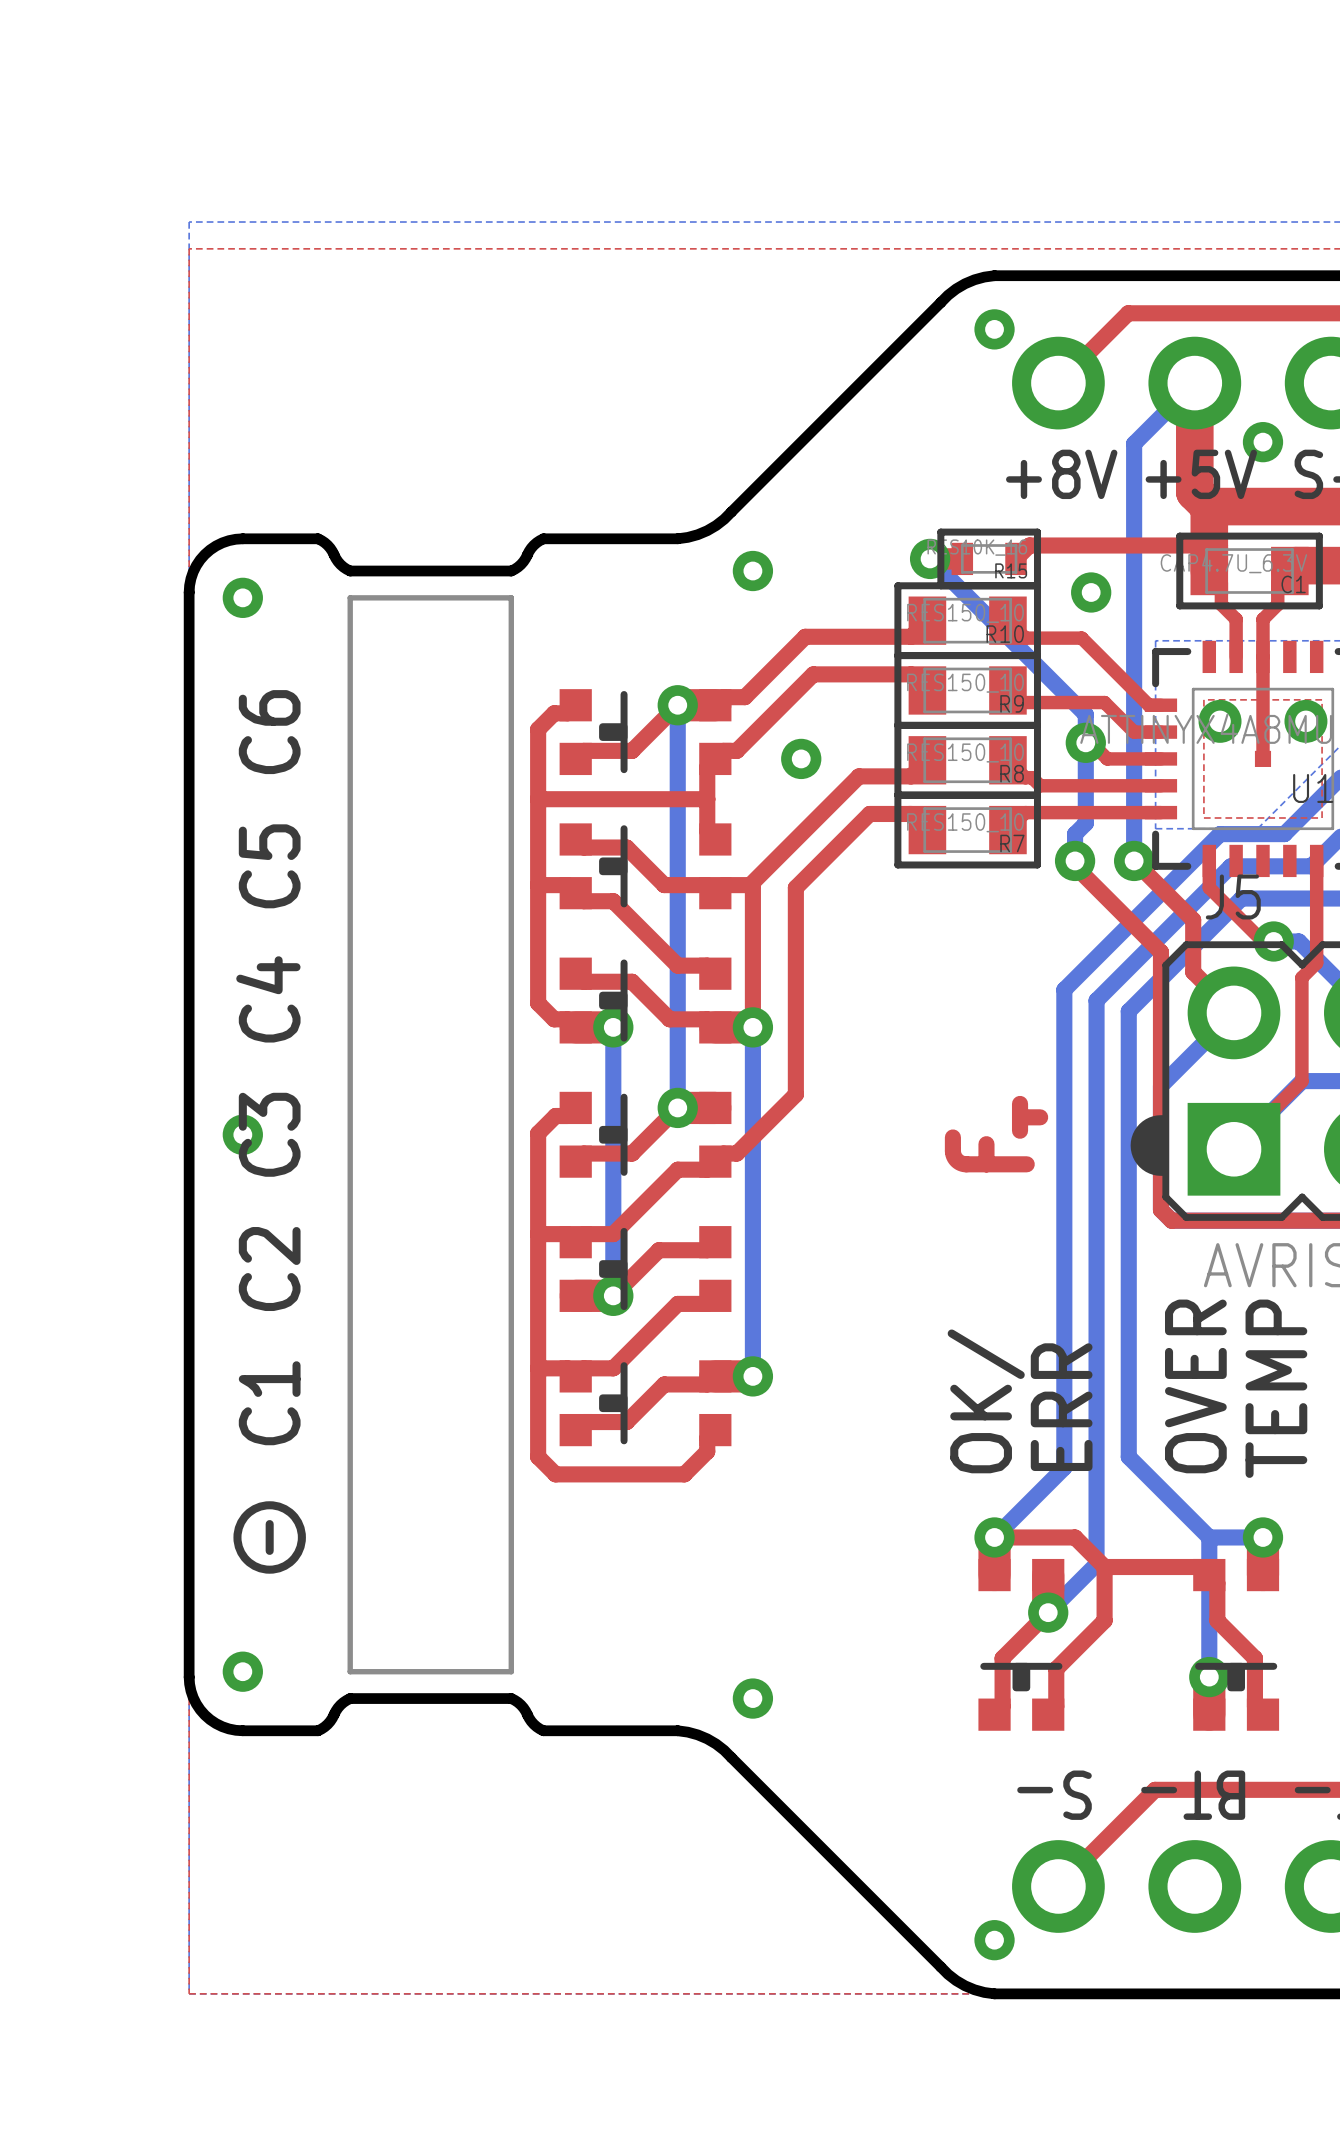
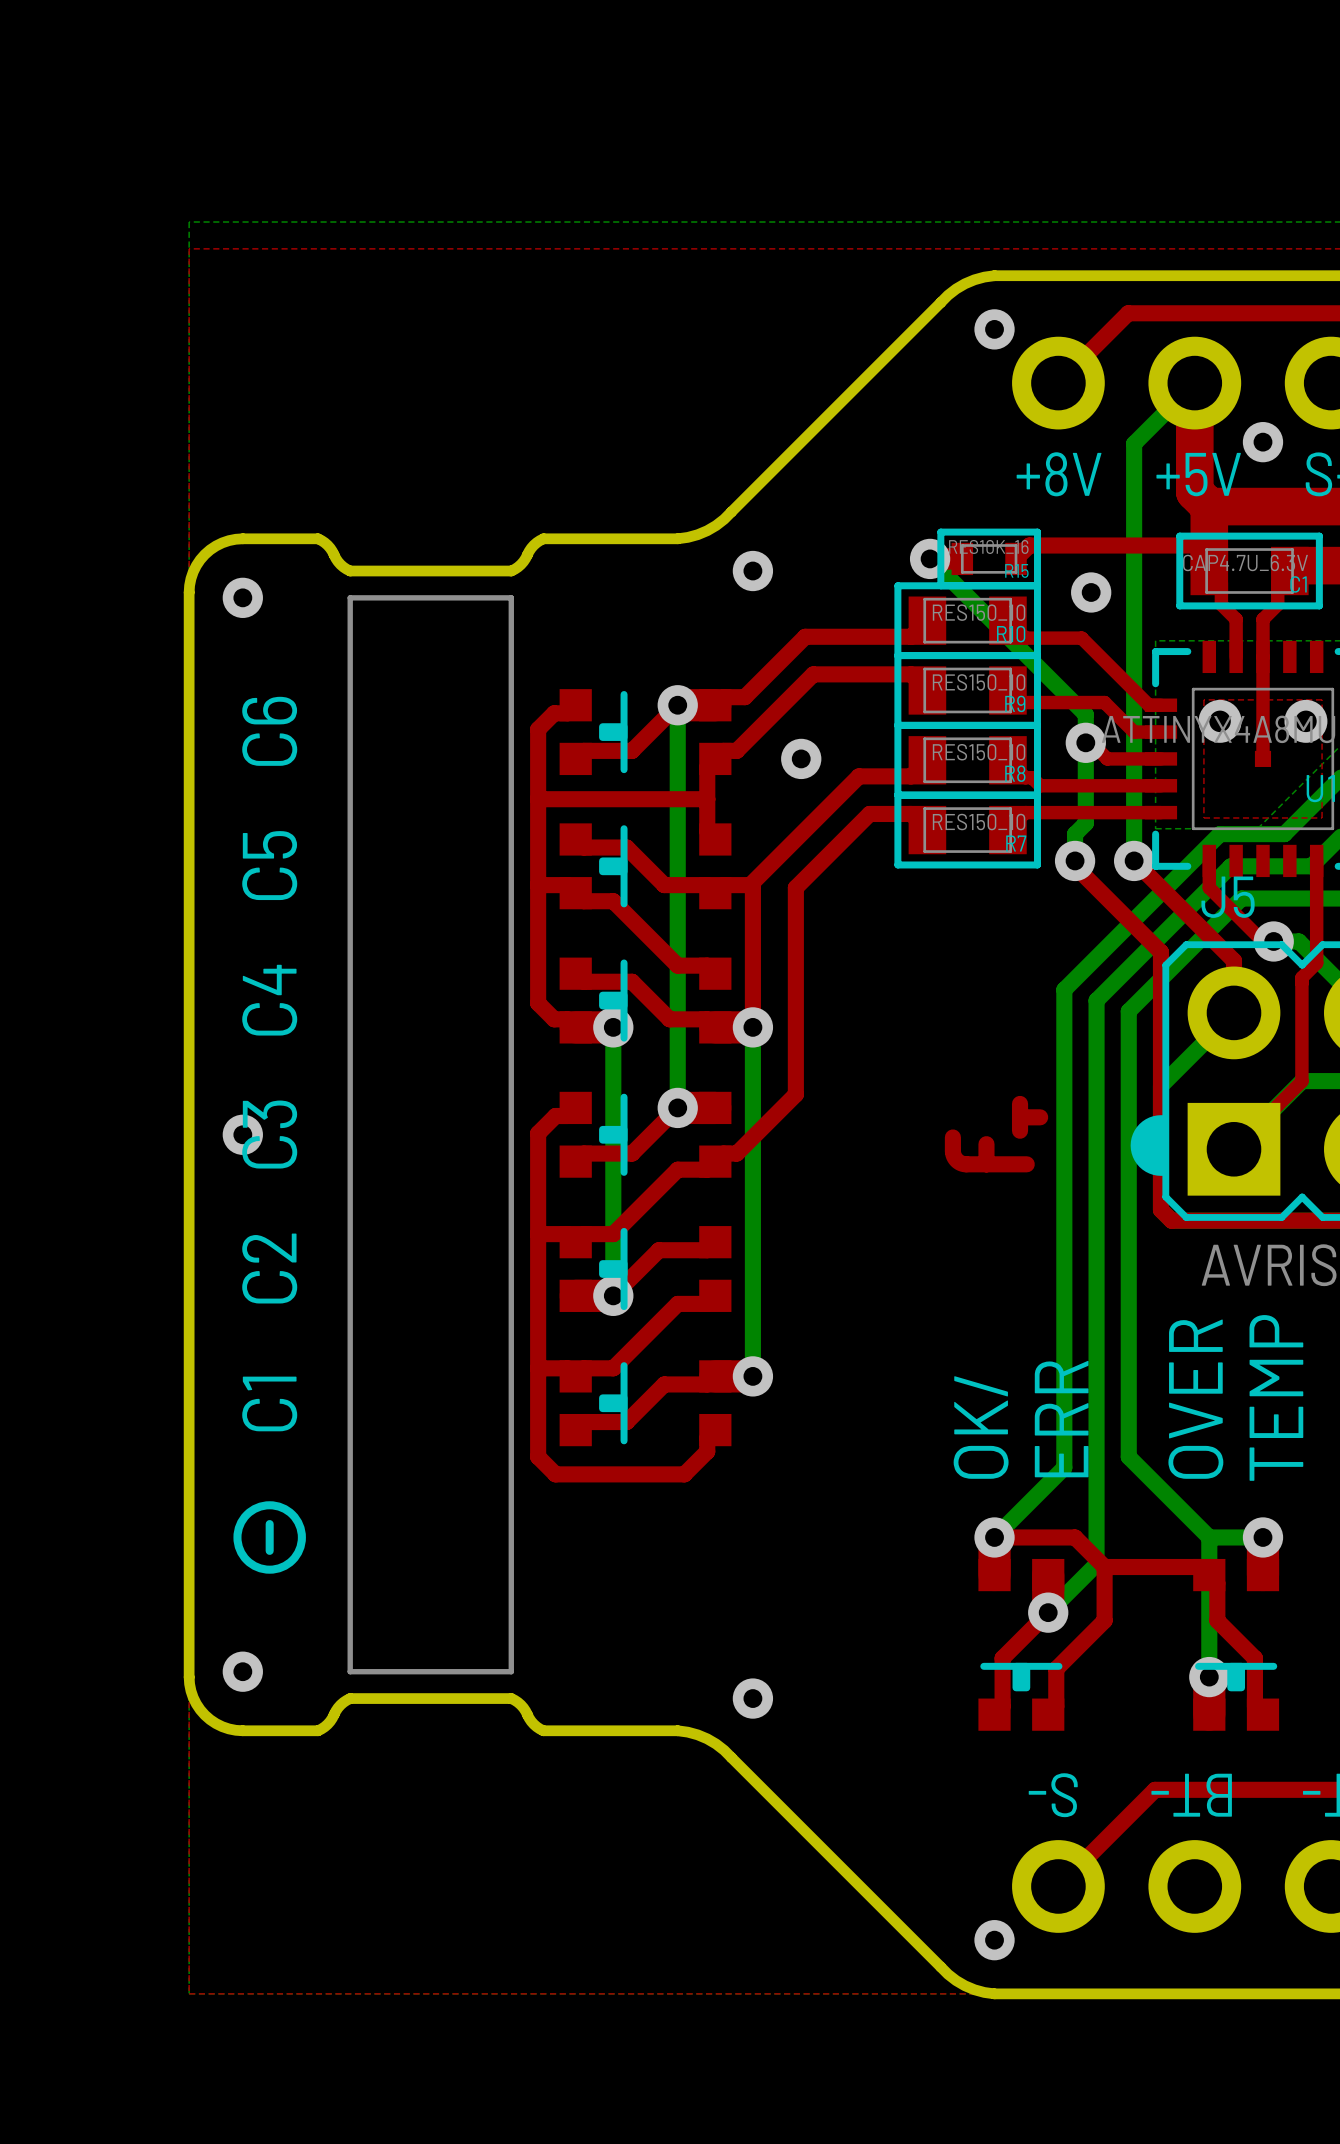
top track: (1193, 920) (1193, 972) (1234, 1012) -> (1193, 920) (1234, 960) (1234, 1012)

